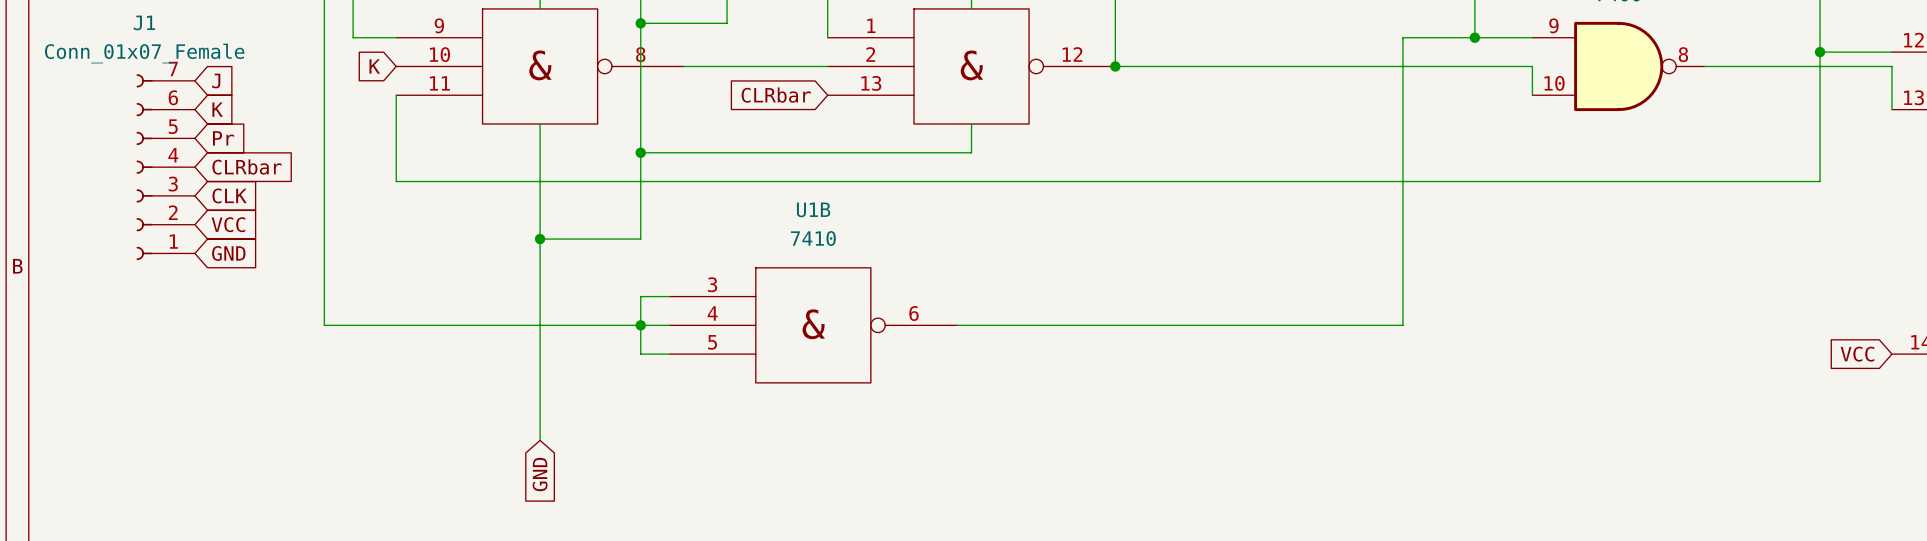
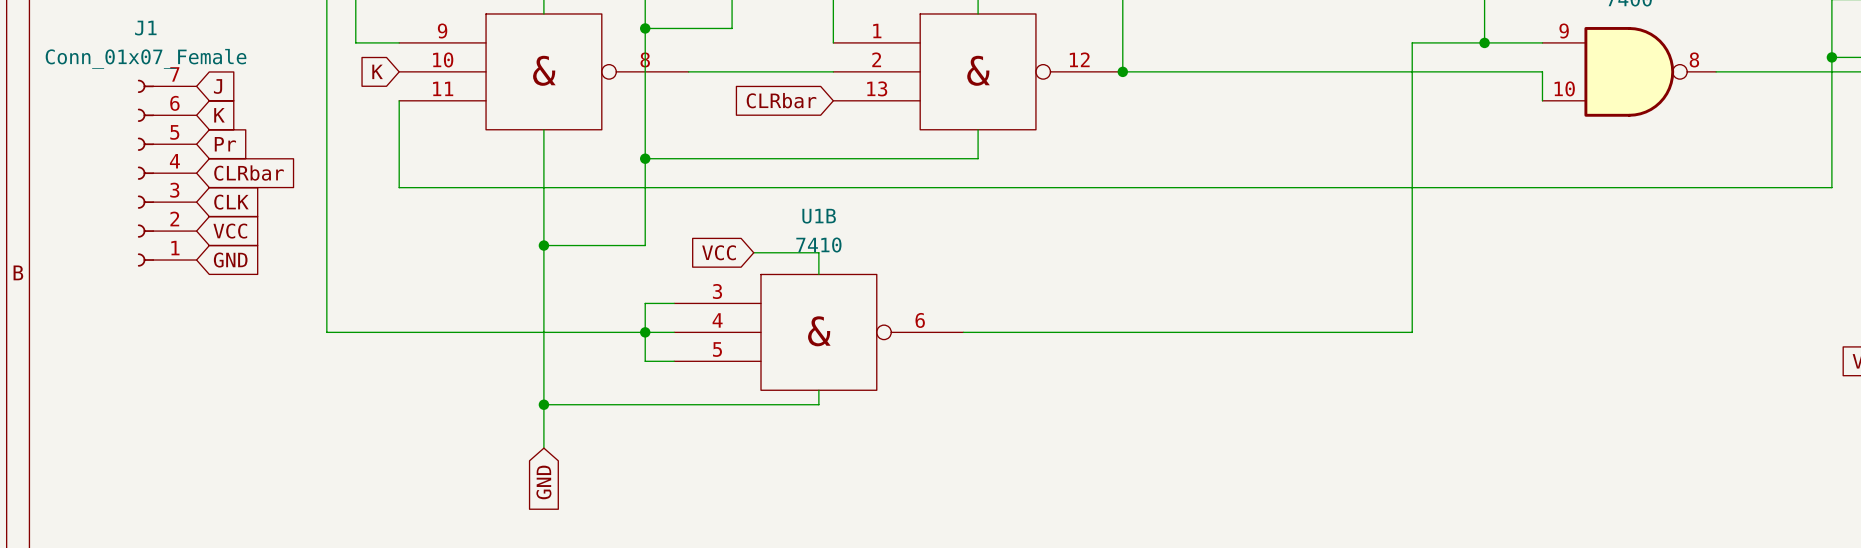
global label: none -> VCC (719, 252)
wire: none -> (753, 252) (818, 252) (818, 274)
wire: none -> (818, 390) (818, 404) (543, 404)
junction: none -> (543, 404)

